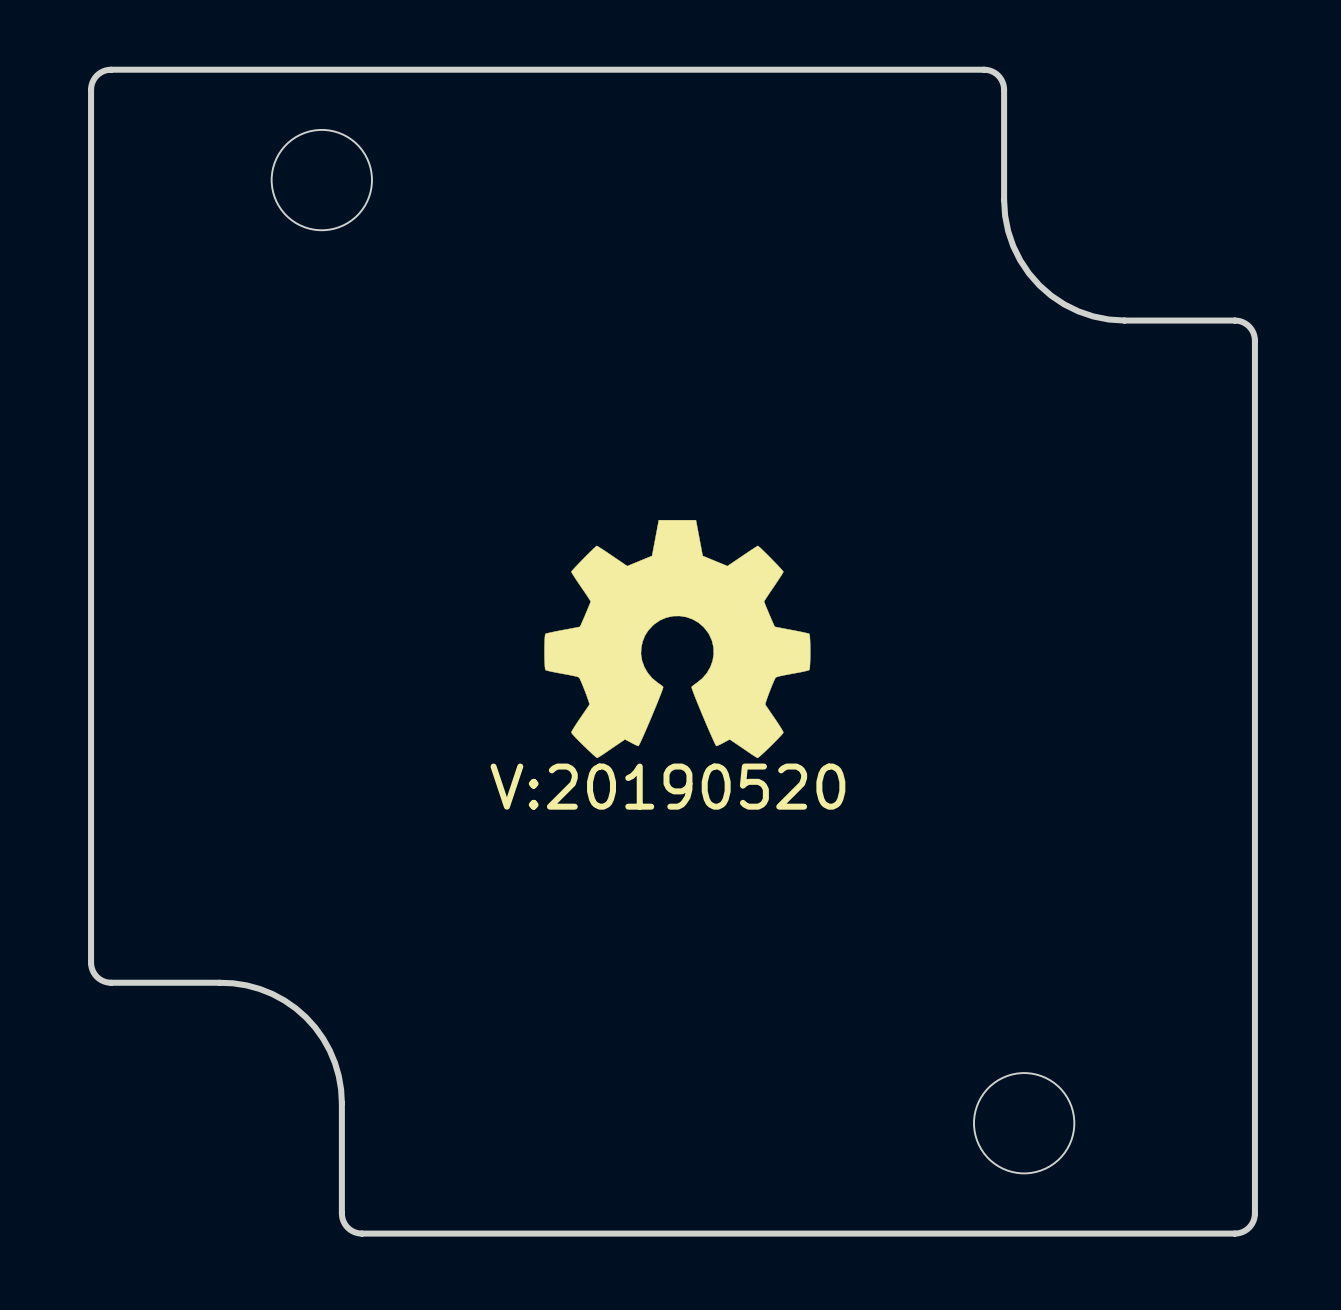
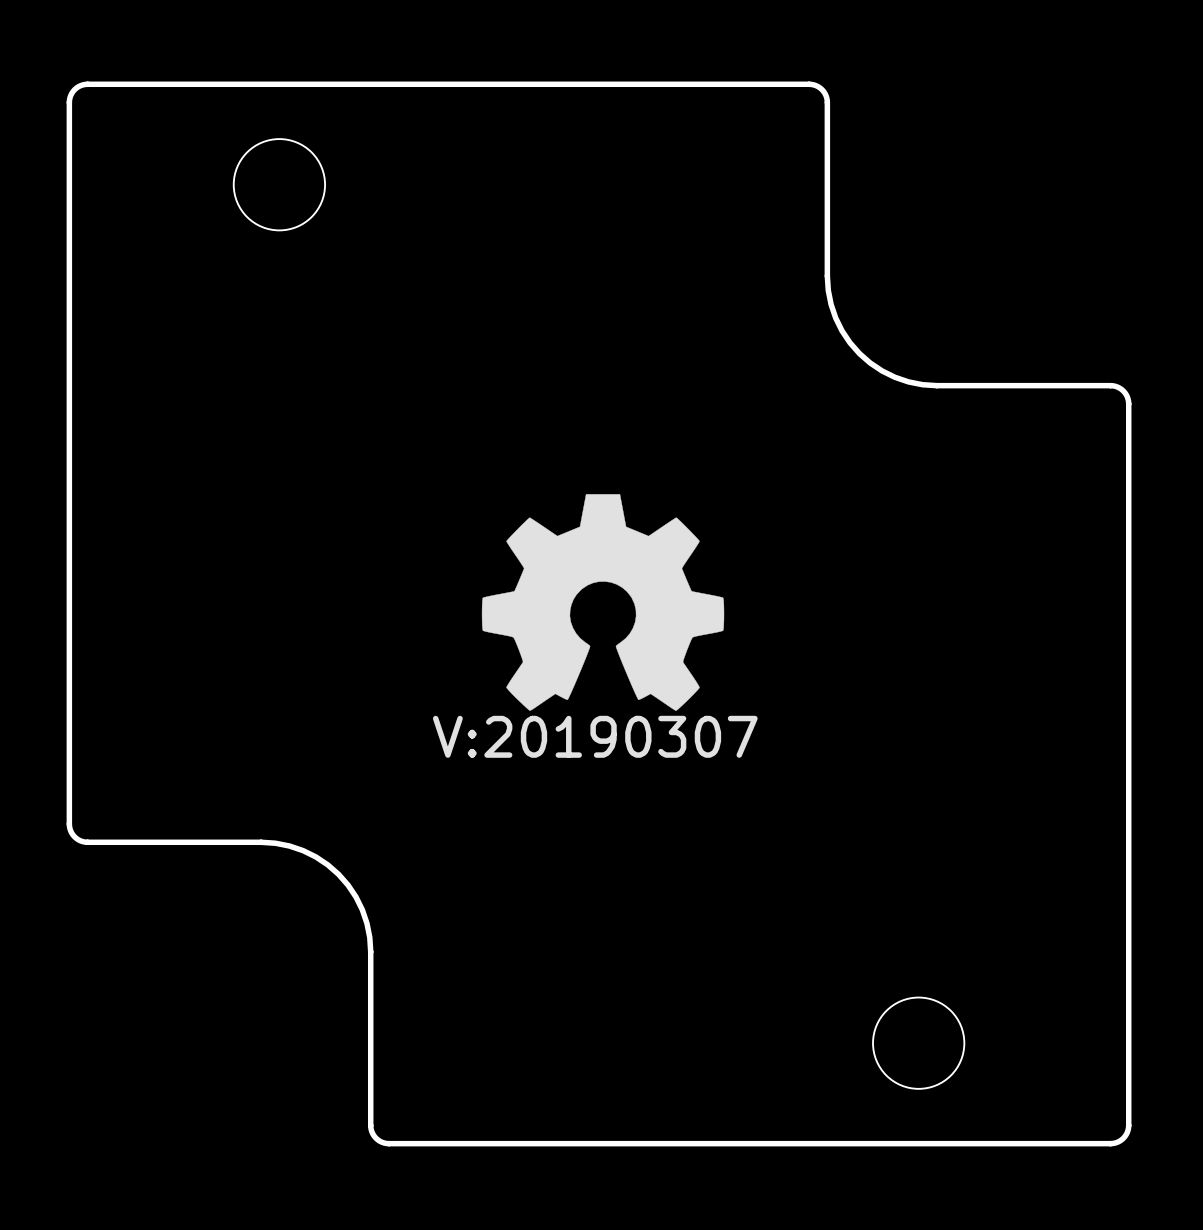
board edge: (903, 69) (984, 69) (991, 71) (998, 75) (1002, 82) (1004, 89) (1005, 215) (1013, 246) (1028, 273) (1039, 285) (1064, 304) (1093, 316) (1124, 320) (1234, 320) (1244, 323) (1250, 328) (1254, 338) (1254, 420) -> (809, 84) (820, 88) (827, 100) (828, 290) (835, 318) (850, 342) (859, 353) (882, 370) (908, 381) (922, 384) (1112, 385) (1123, 391) (1128, 403)
drawing shape: [490, 763, 846, 810] -> [432, 715, 758, 758]
board edge: (91, 882) (91, 962) (92, 970) (96, 976) (103, 981) (111, 982) (219, 982) (246, 985) (272, 994) (295, 1008) (305, 1017) (323, 1038) (334, 1062) (338, 1076) (341, 1103) (341, 1213) (344, 1223) (349, 1229) (359, 1233) (442, 1233) -> (69, 824) (74, 836) (85, 842) (275, 843) (289, 846) (315, 856) (338, 874) (348, 885) (362, 909) (369, 937) (370, 1127) (377, 1139) (388, 1143)

